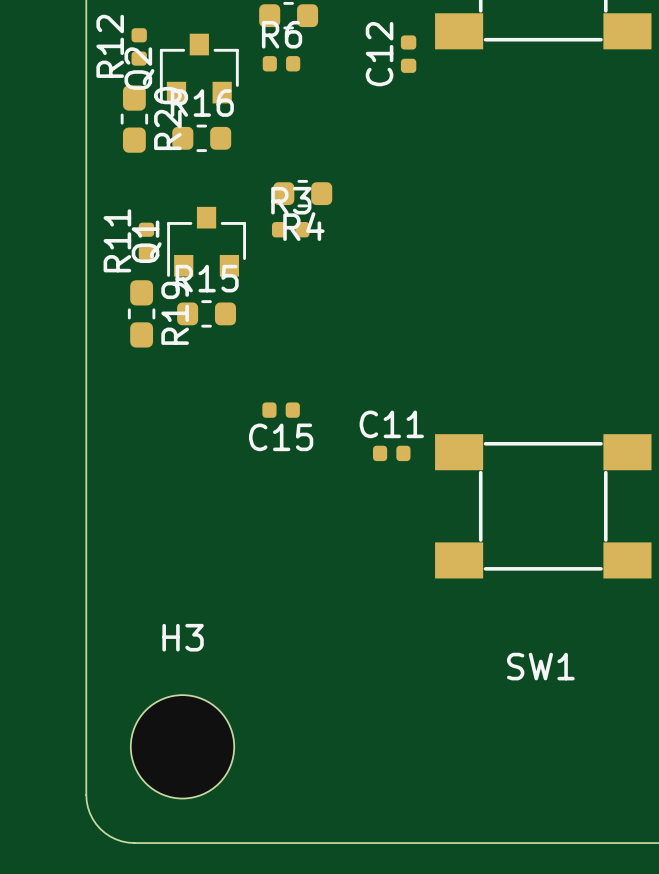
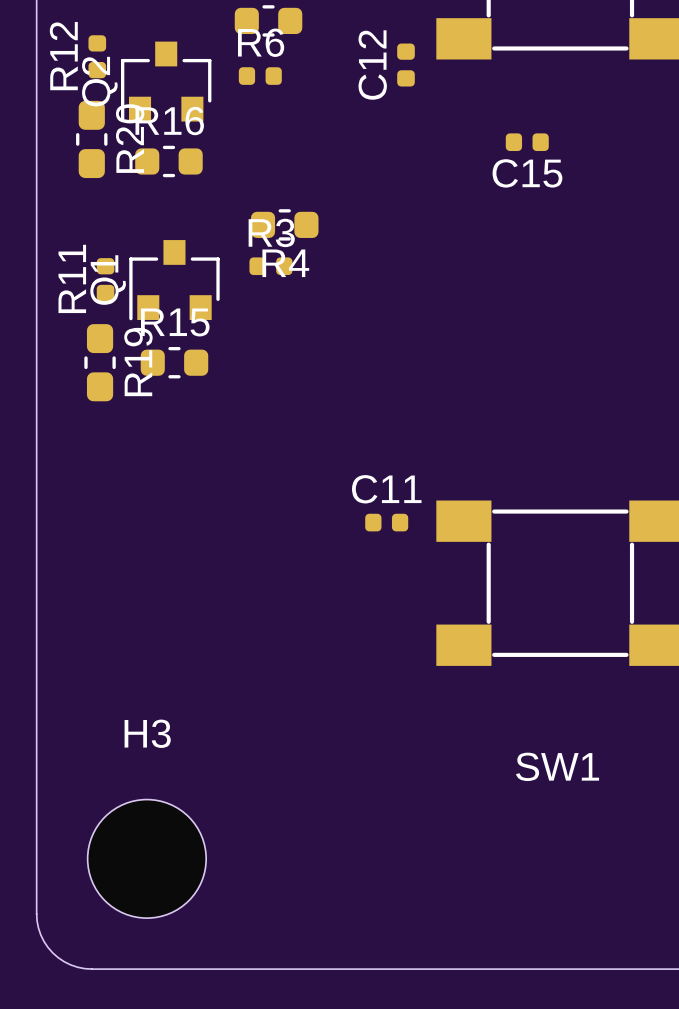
C15 position: (281, 410) -> (527, 142)

